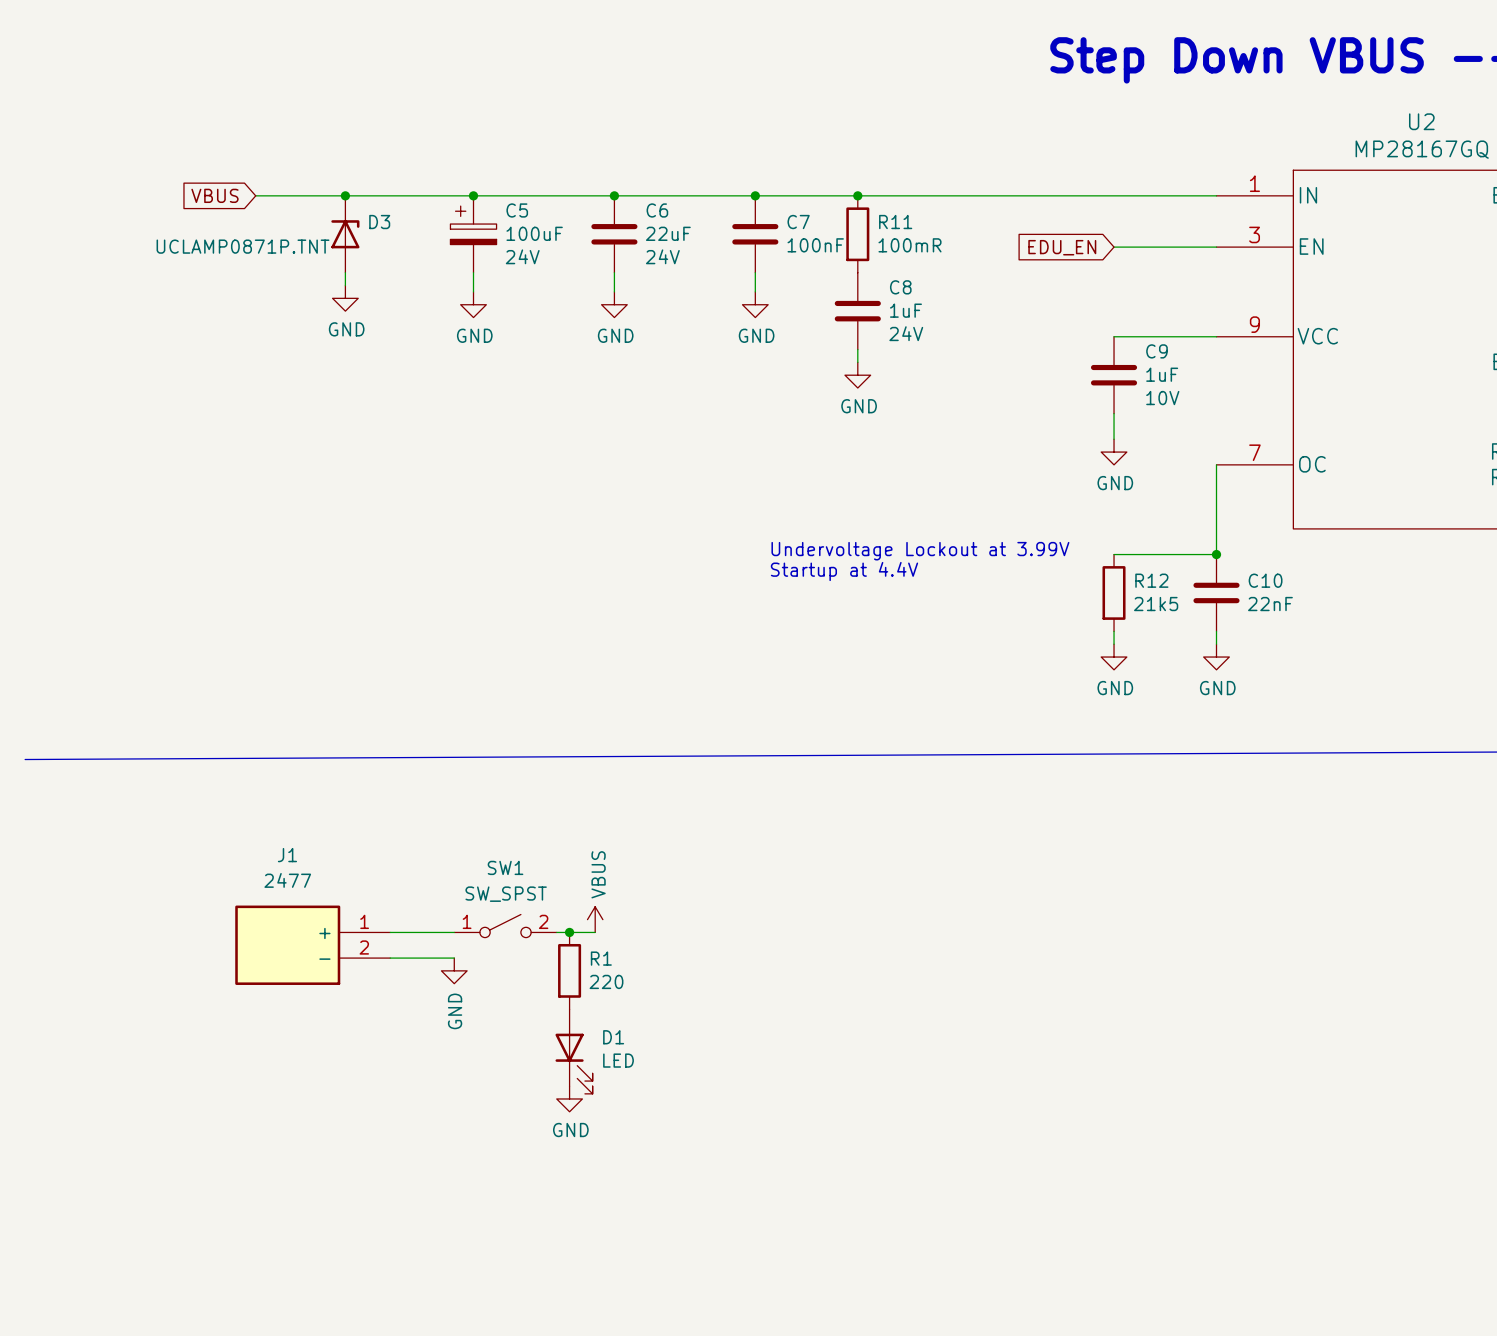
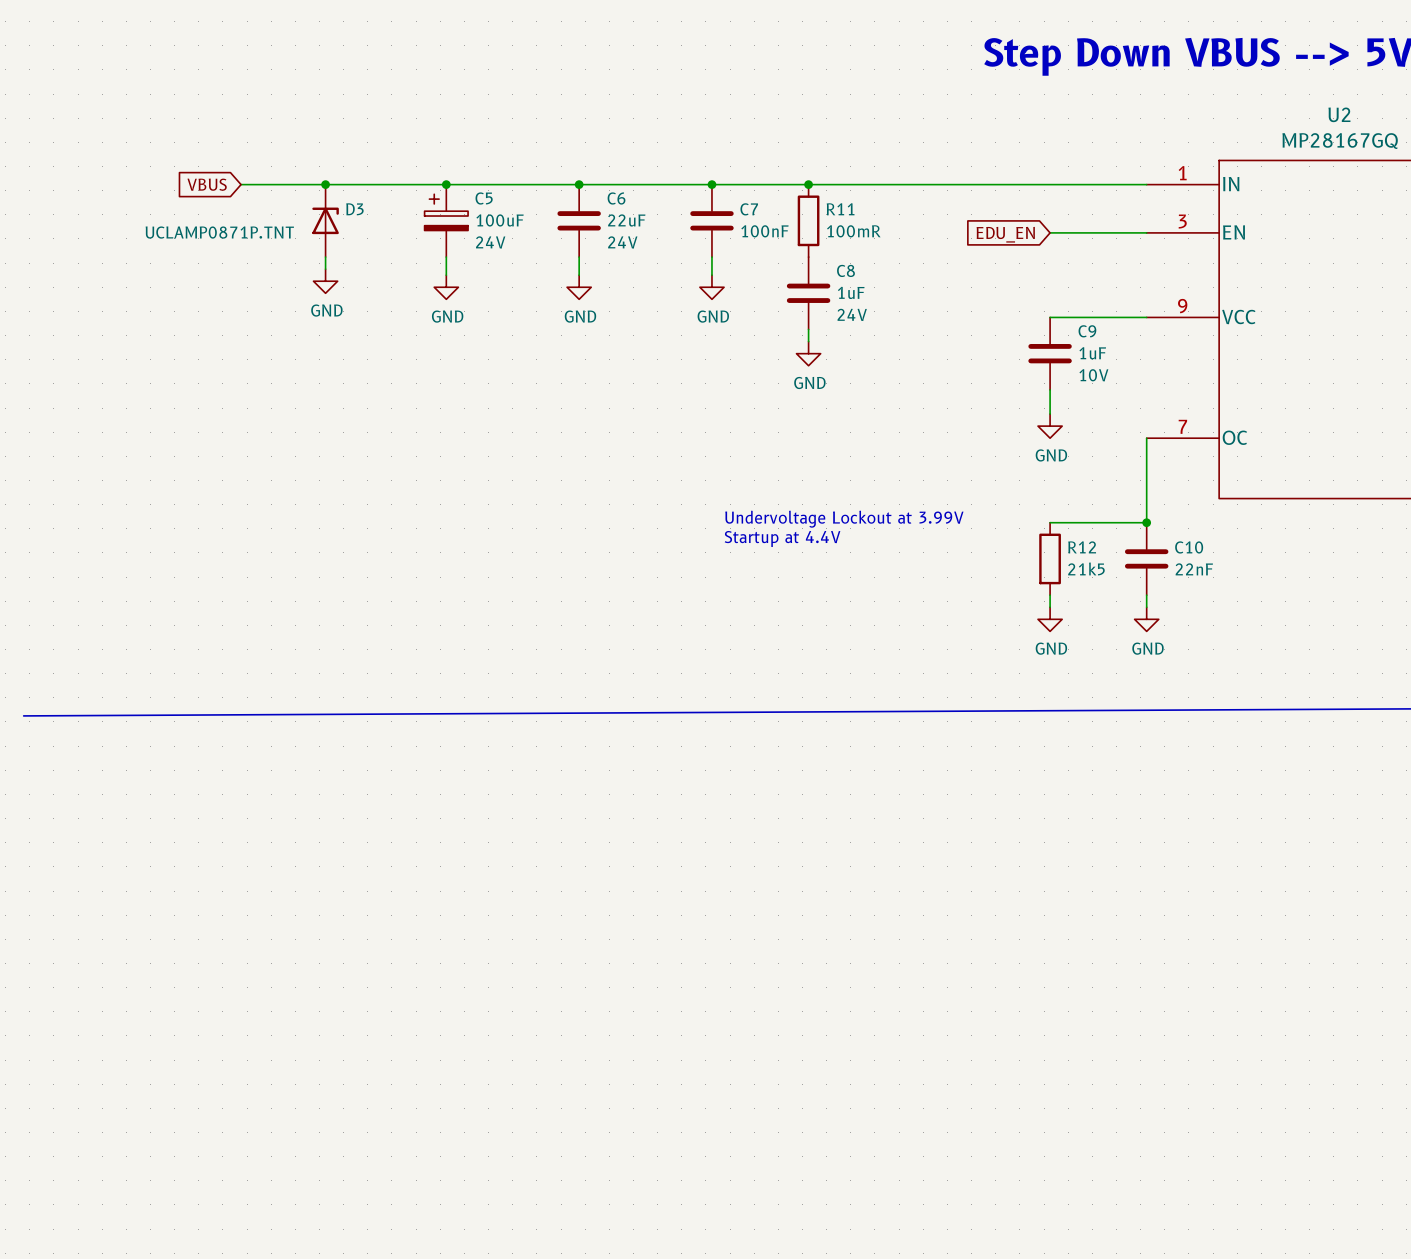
power symbol: VBUS (595, 919) -> none
SW1: SW_SPST (505, 926) -> none
wire: (390, 932) (454, 932) -> none
wire: (556, 932) (595, 932) -> none
junction: (569, 932) -> none
J1: 2477 (312, 945) -> none
wire: (390, 958) (454, 958) -> none
power symbol: GND (454, 970) -> none
R1: 220 (569, 970) -> none
D1: LED (574, 1051) -> none
power symbol: GND (569, 1098) -> none

